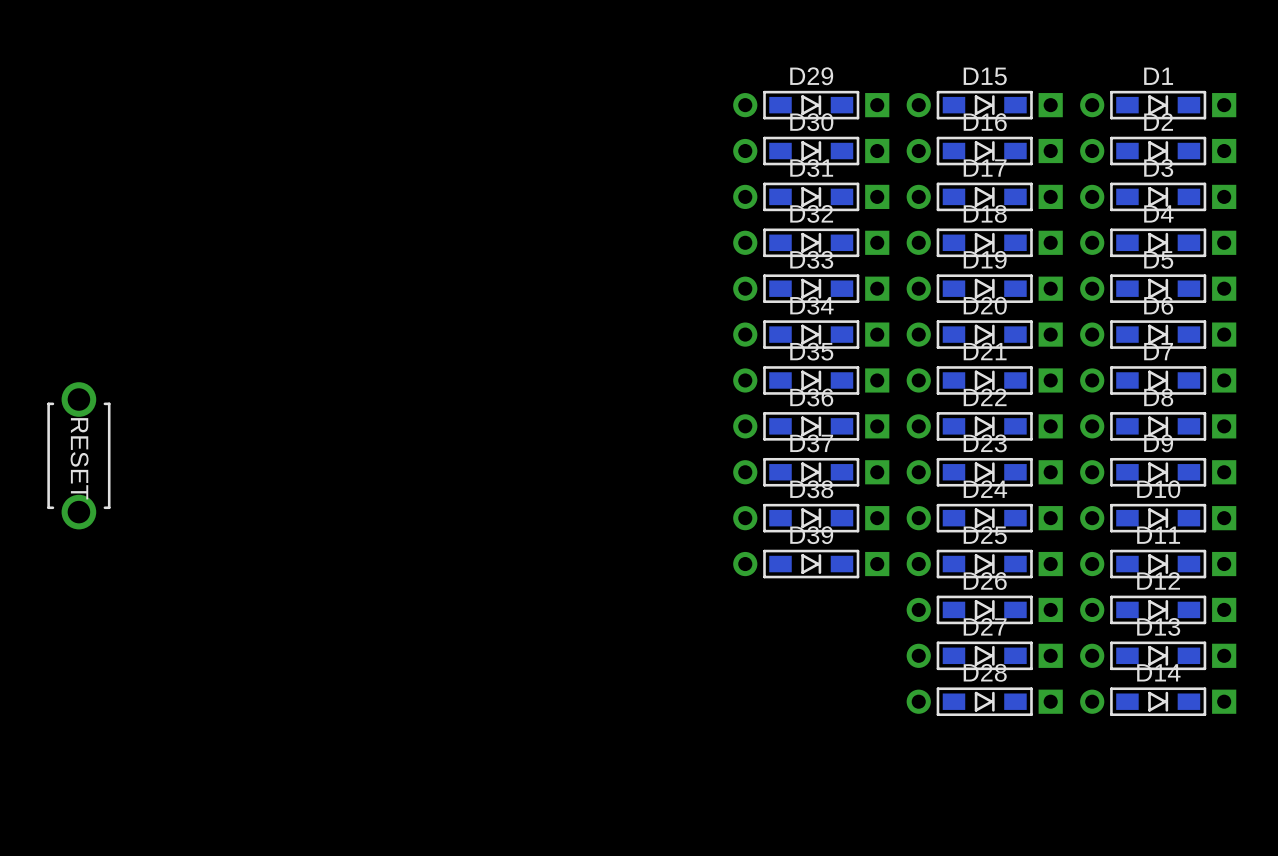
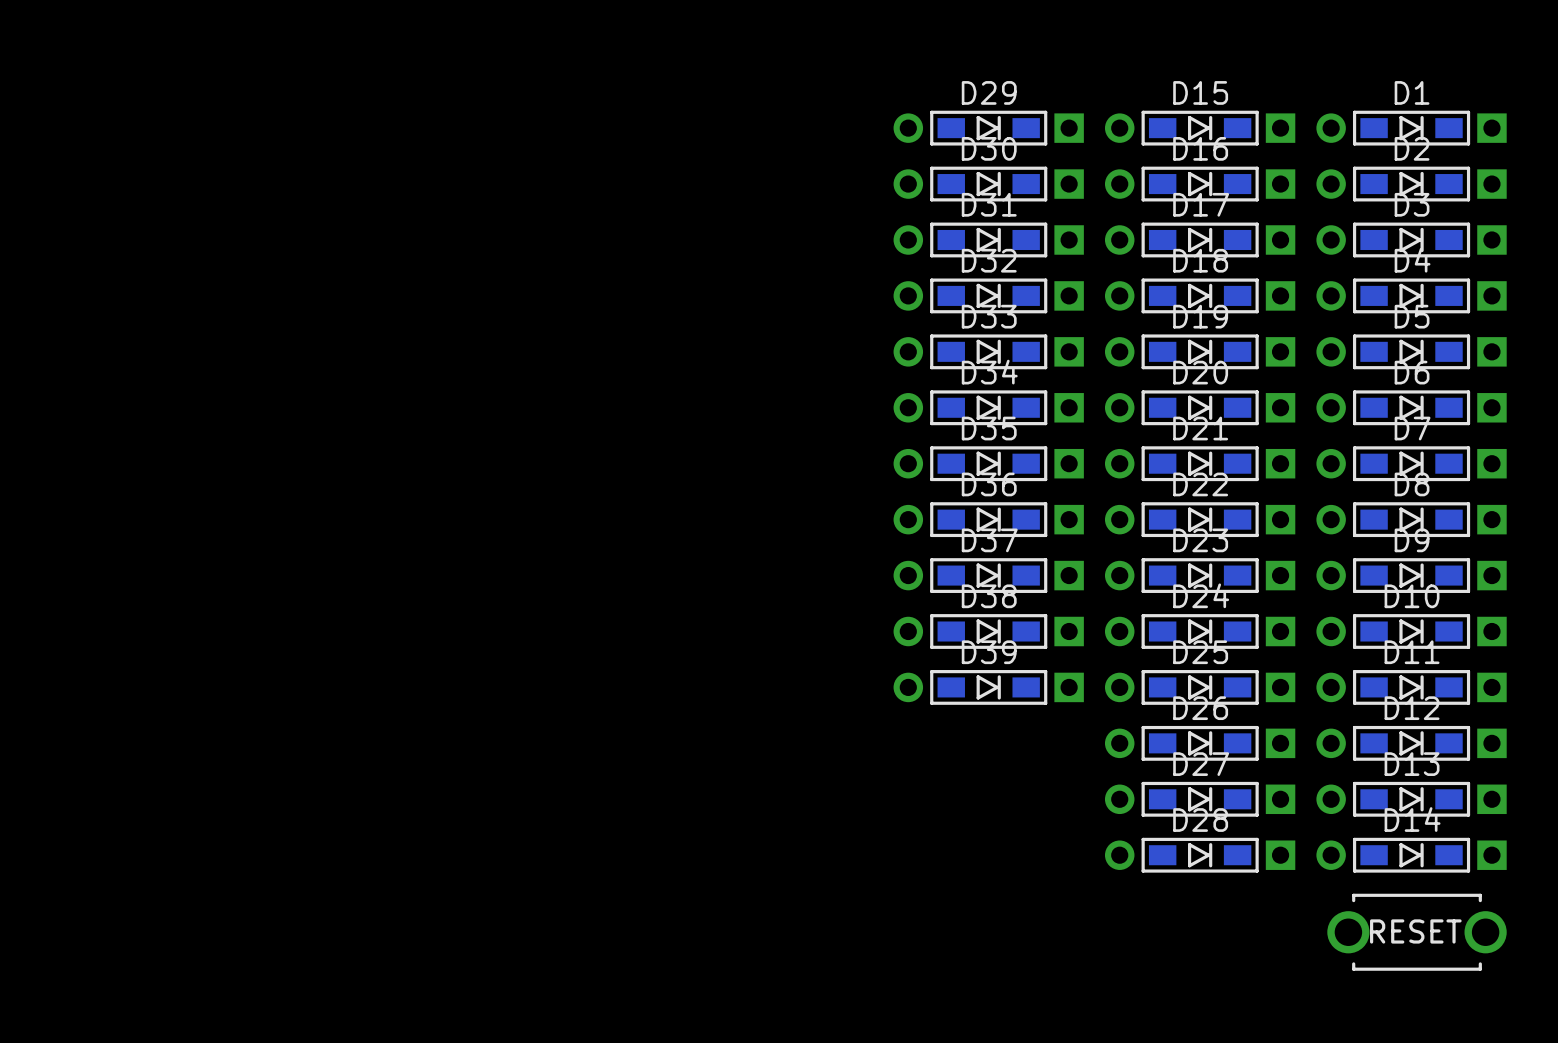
part: (78, 455) -> none
part: none -> (1417, 932)

